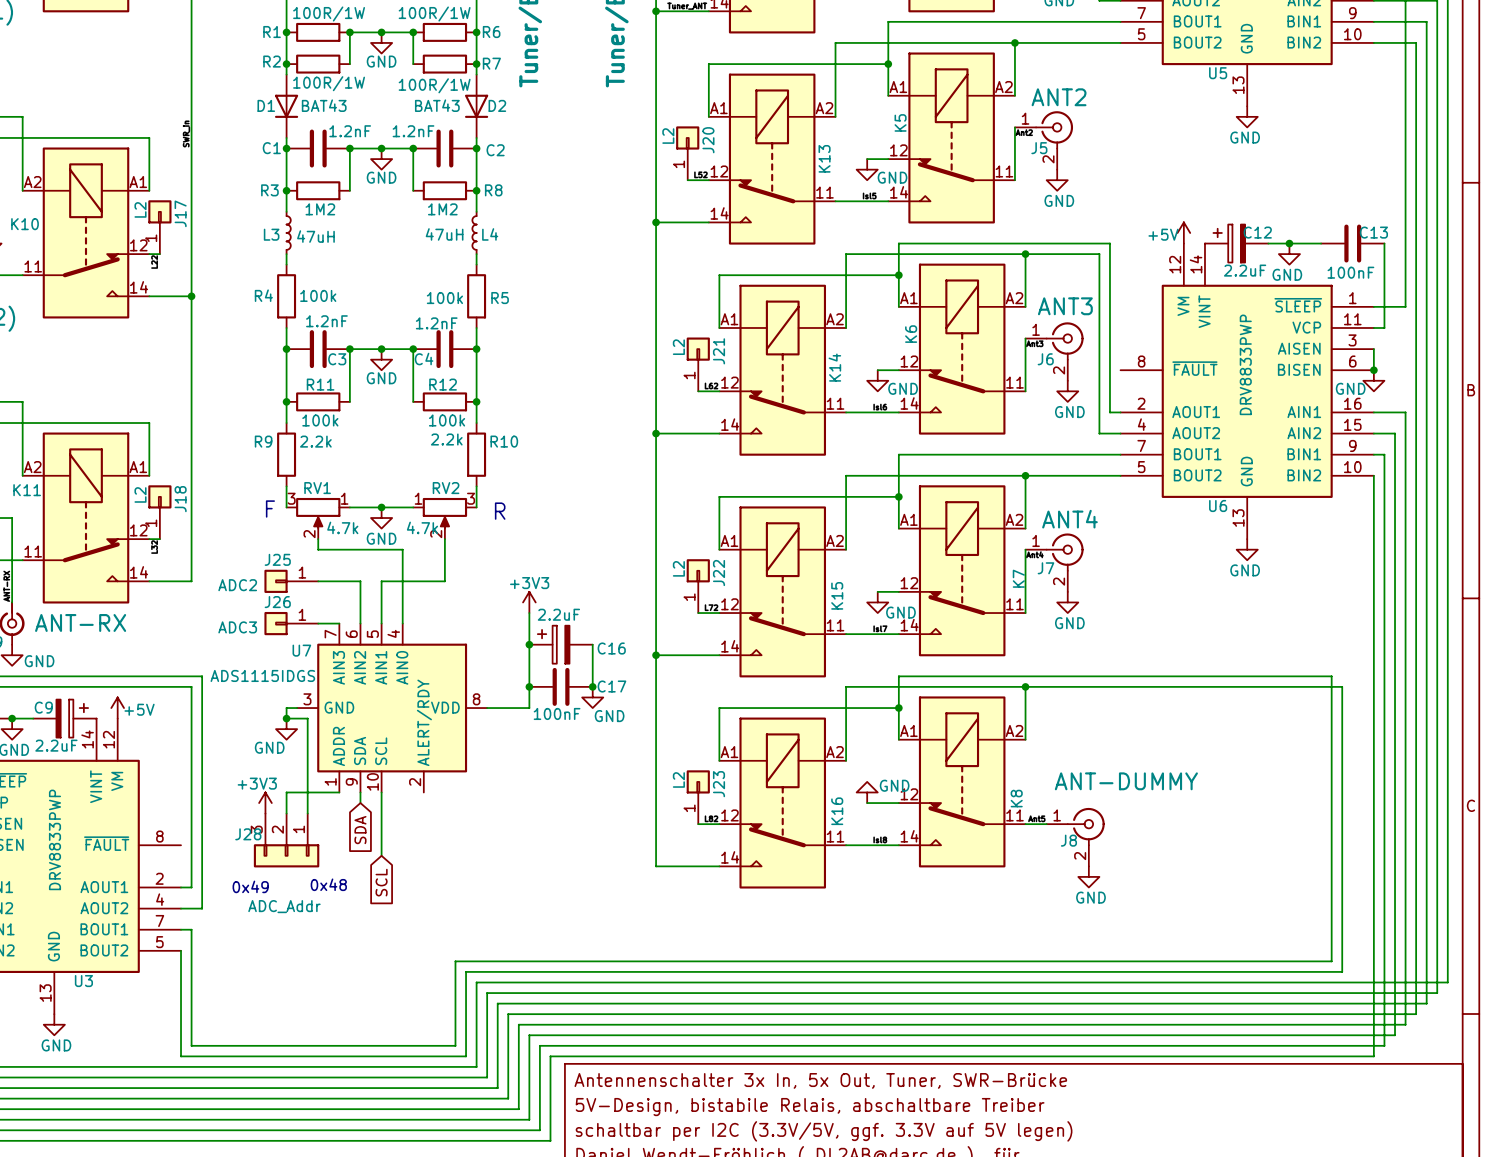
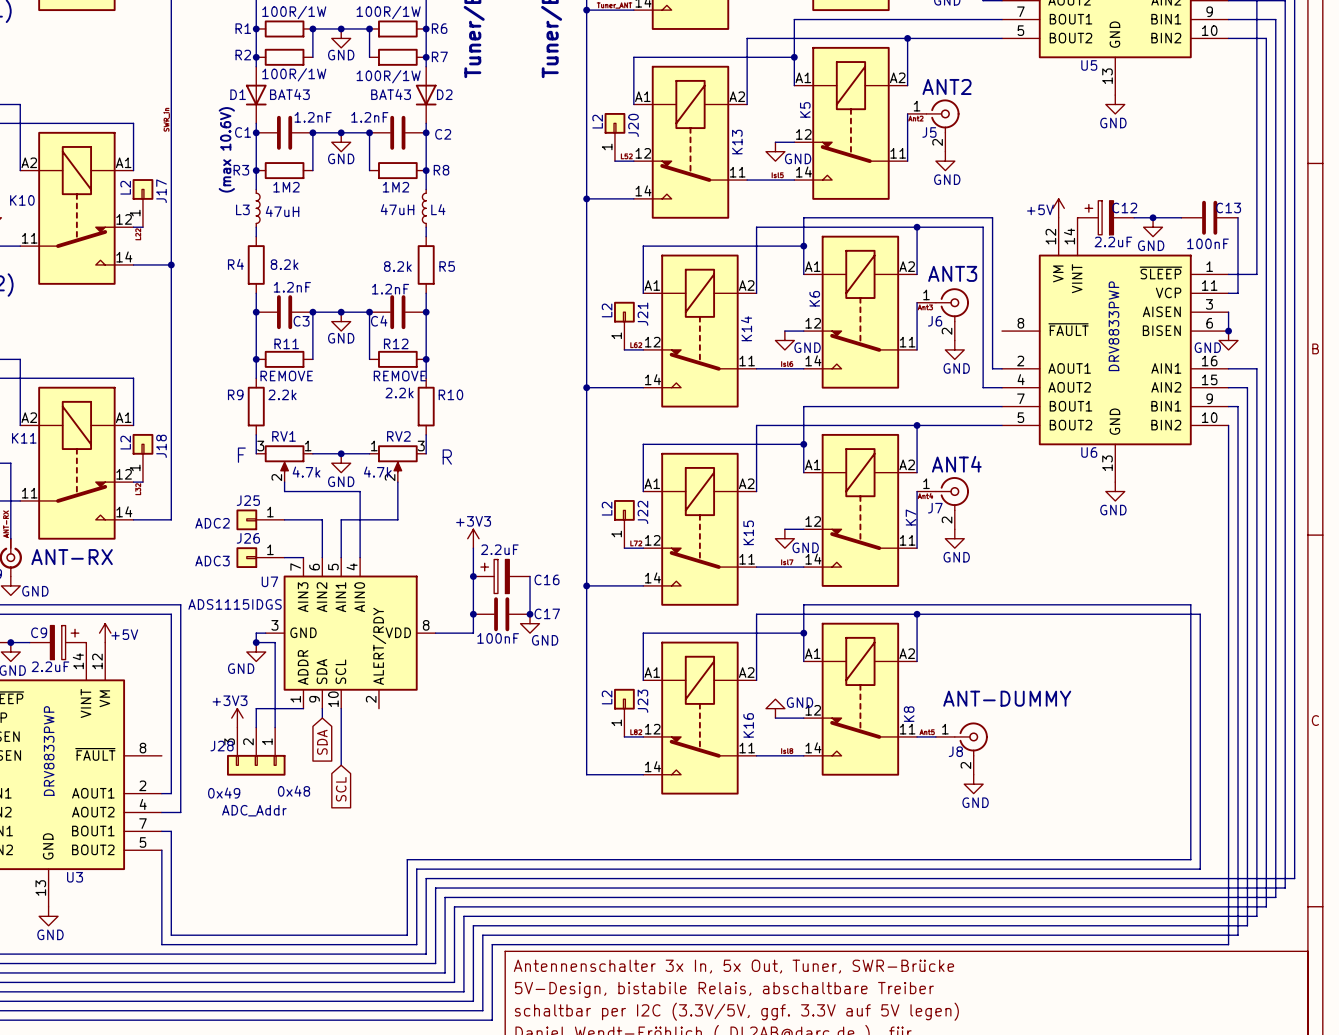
text: none -> (max 10.6V) (226, 149)
R4 value: 100k (318, 295) -> 8.2k (284, 264)
R5 value: 100k (444, 298) -> 8.2k (397, 266)
R11 value: 100k (320, 420) -> REMOVE (286, 376)
R12 value: 100k (447, 420) -> REMOVE (399, 376)

